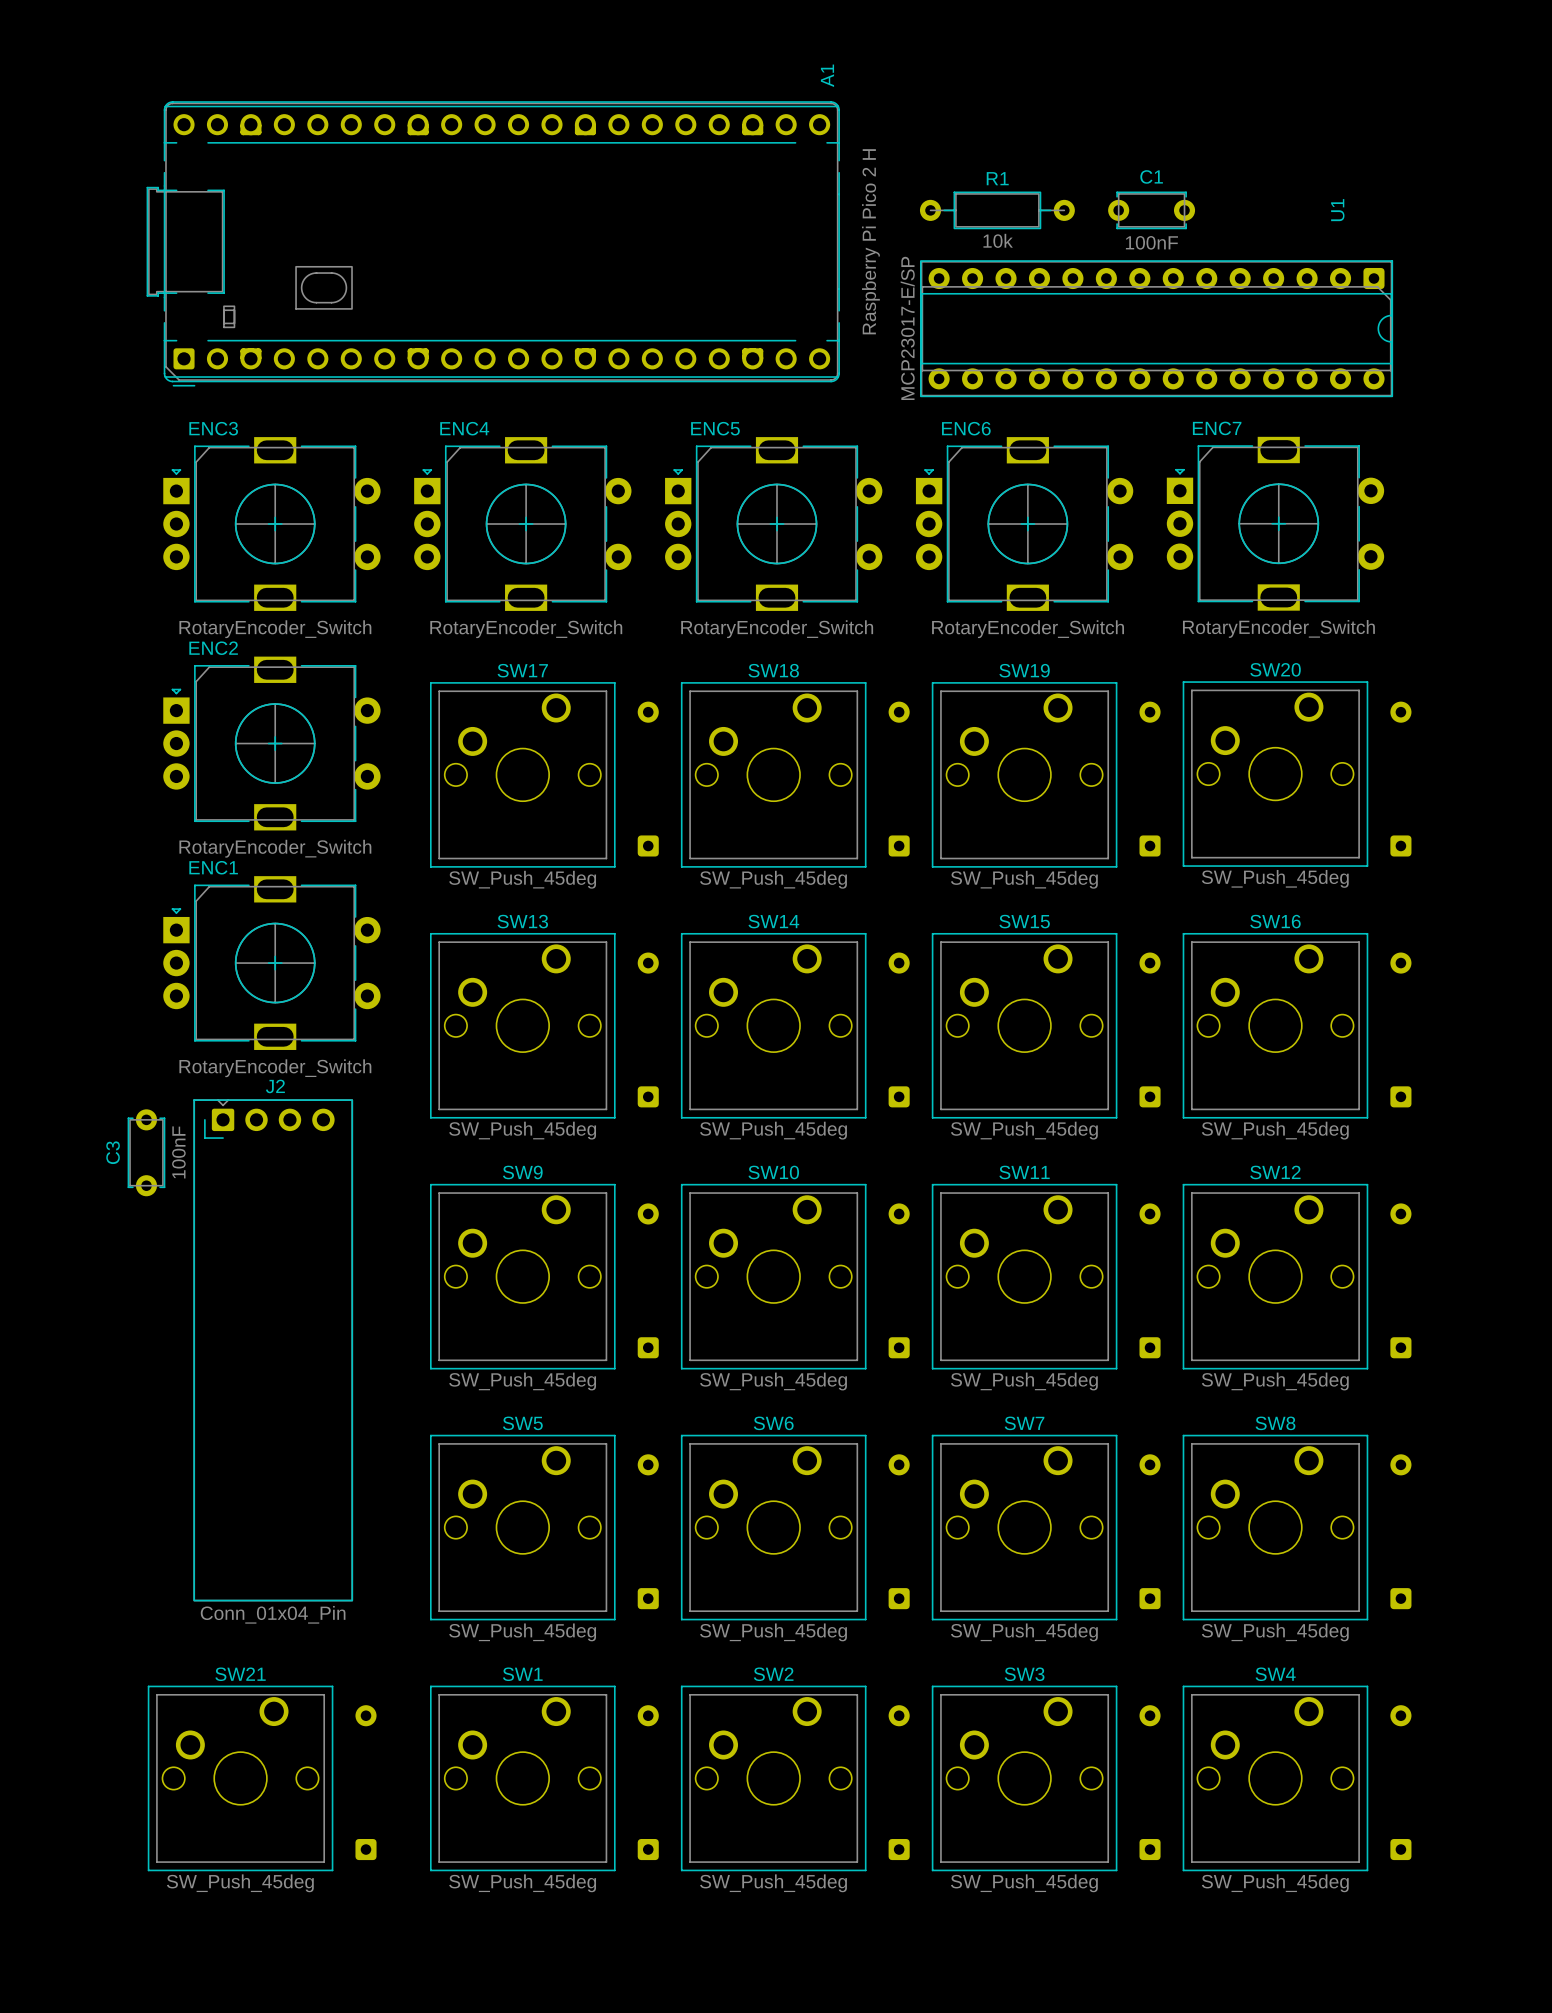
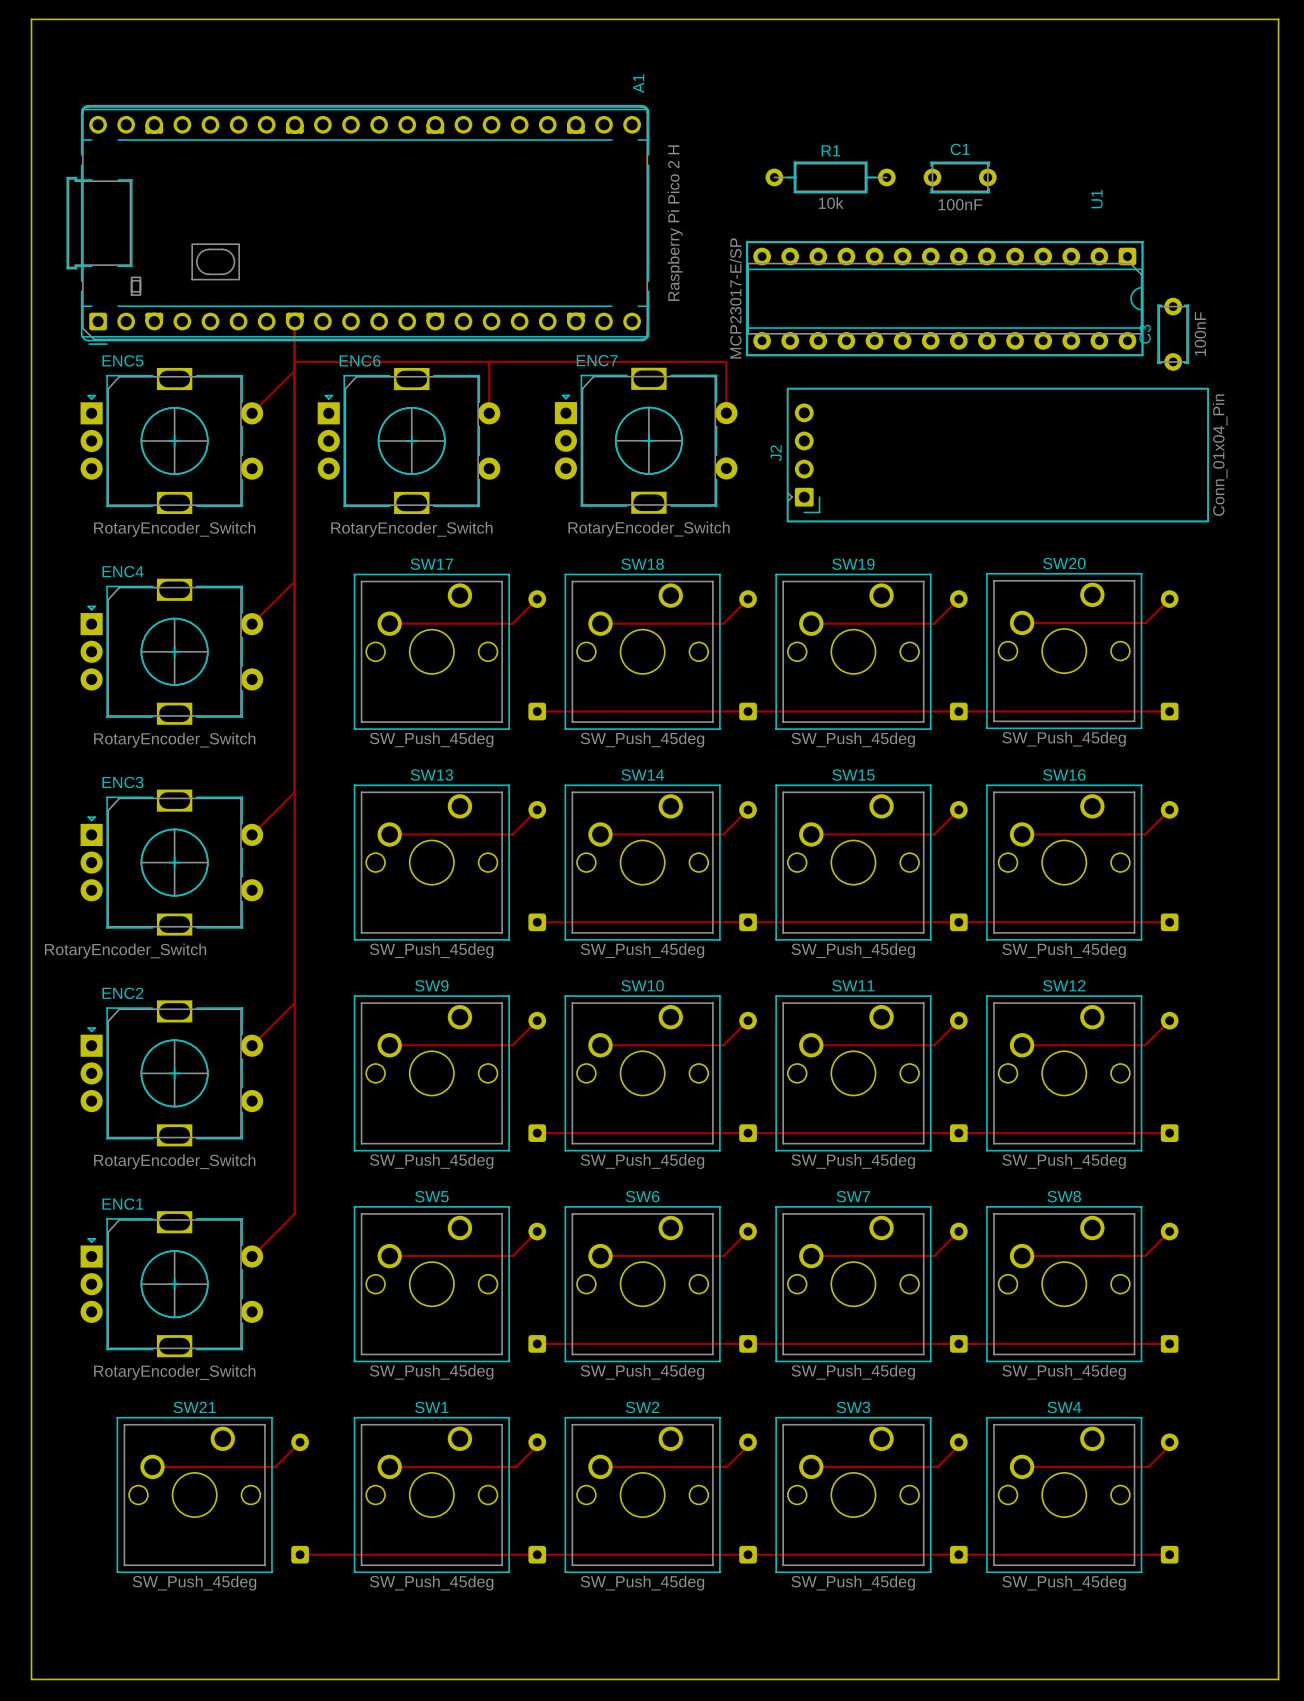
board edge: none -> (31, 19) (1278, 19) (1278, 1679) (31, 1679) (31, 19)
A1 position: (493, 243) -> (357, 224)
U1 position: (1156, 328) -> (944, 298)
track: none -> (294, 321) (294, 1213) (252, 1256)
track: none -> (294, 361) (725, 361) (726, 413)
track: none -> (488, 361) (489, 413)
track: none -> (294, 370) (252, 413)
ENC7 position: (1275, 523) -> (646, 440)
ENC3 position: (271, 524) -> (171, 862)
ENC4 position: (522, 524) -> (171, 651)
ENC5 position: (773, 524) -> (171, 440)
ENC6 position: (1024, 524) -> (408, 440)
ENC3 value position: RotaryEncoder_Switch (275, 629) -> RotaryEncoder_Switch (125, 950)
track: none -> (294, 581) (252, 624)
track: none -> (537, 599) (512, 623) (389, 623)
track: none -> (748, 599) (723, 623) (600, 623)
track: none -> (958, 599) (934, 623) (811, 623)
track: none -> (1169, 599) (1145, 622) (1022, 622)
ENC2 position: (271, 743) -> (171, 1073)
track: none -> (537, 711) (1169, 711)
track: none -> (294, 792) (252, 834)
ENC1 position: (271, 963) -> (171, 1284)
track: none -> (537, 809) (512, 834) (389, 834)
track: none -> (748, 809) (723, 834) (600, 834)
track: none -> (958, 809) (934, 834) (811, 834)
track: none -> (1169, 809) (1145, 834) (1022, 834)
track: none -> (537, 922) (1169, 922)
C3 position: (146, 1152) -> (1173, 334)
track: none -> (294, 1002) (252, 1045)
track: none -> (537, 1020) (512, 1045) (389, 1045)
track: none -> (748, 1020) (723, 1045) (600, 1045)
track: none -> (958, 1020) (934, 1045) (811, 1045)
track: none -> (1169, 1020) (1145, 1045) (1022, 1045)
track: none -> (537, 1133) (1169, 1133)
J2 rotation: 0° (273, 1350) -> 90° counterclockwise (997, 455)
J2 position: (273, 1350) -> (997, 455)
track: none -> (537, 1231) (512, 1256) (389, 1256)
track: none -> (748, 1231) (723, 1256) (600, 1256)
track: none -> (958, 1231) (934, 1256) (811, 1256)
track: none -> (1169, 1231) (1145, 1256) (1022, 1256)
track: none -> (537, 1343) (1169, 1343)
track: none -> (300, 1442) (275, 1466) (152, 1466)
track: none -> (540, 1442) (516, 1466) (389, 1466)
track: none -> (751, 1442) (726, 1466) (600, 1466)
track: none -> (962, 1442) (937, 1466) (811, 1466)
track: none -> (1173, 1442) (1148, 1466) (1022, 1466)
track: none -> (300, 1554) (1173, 1554)

